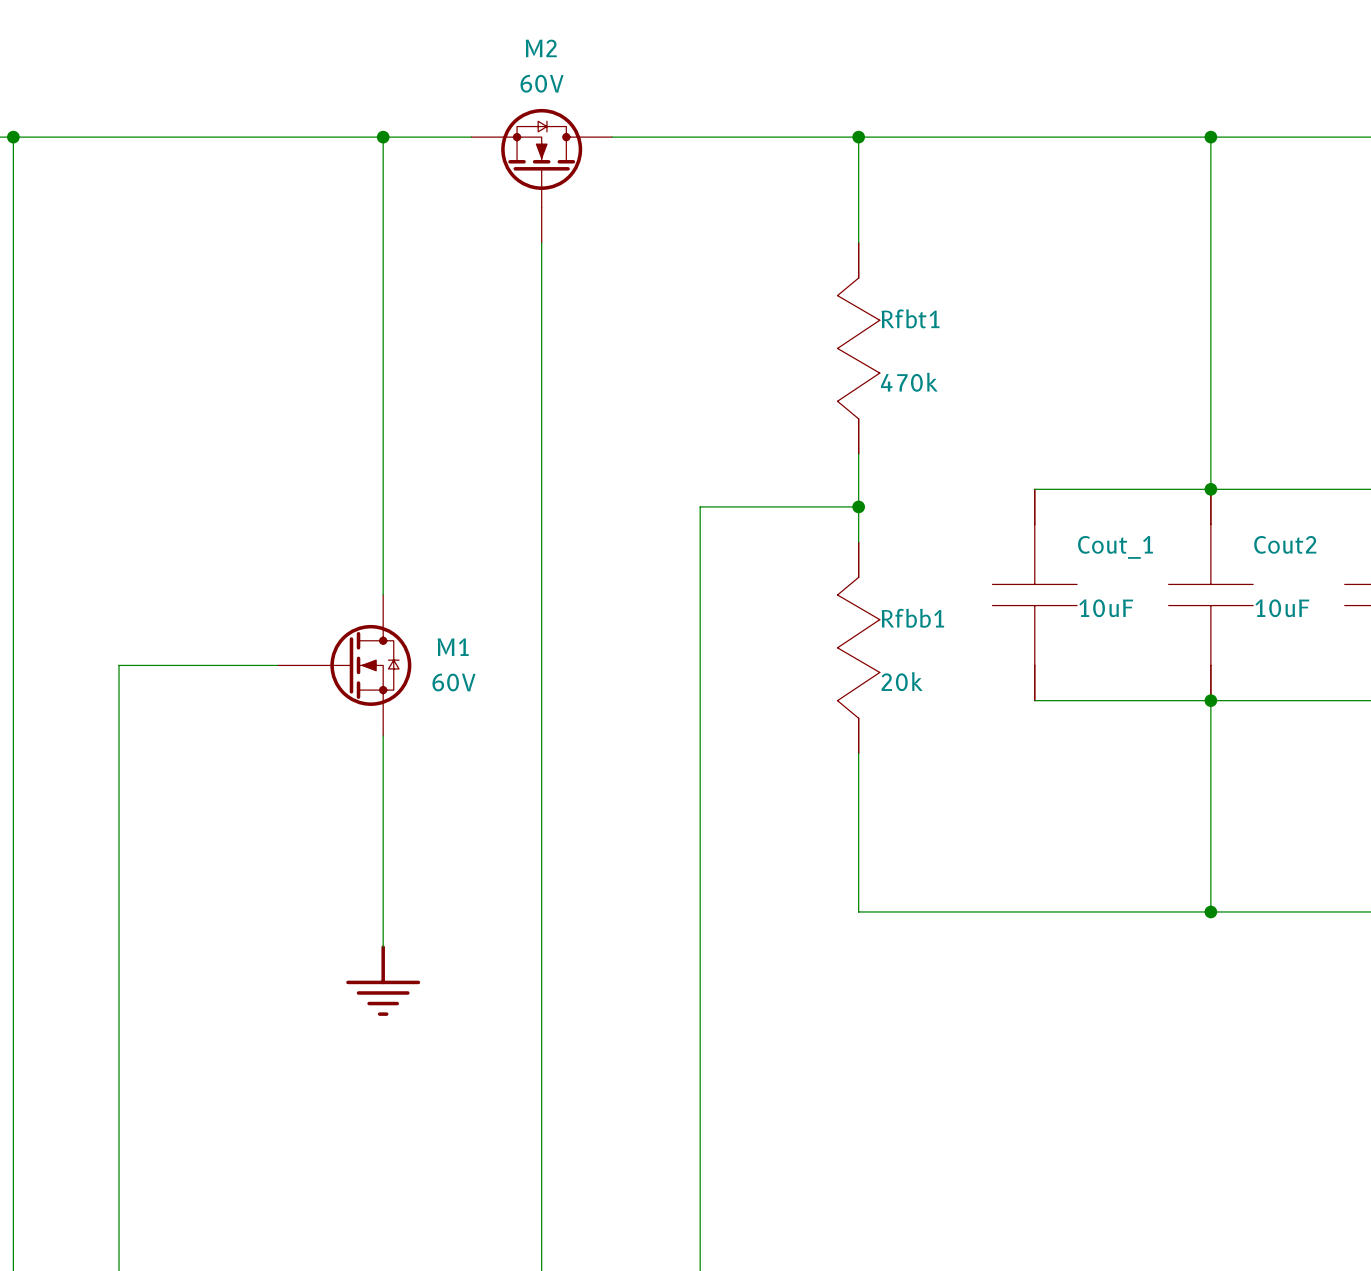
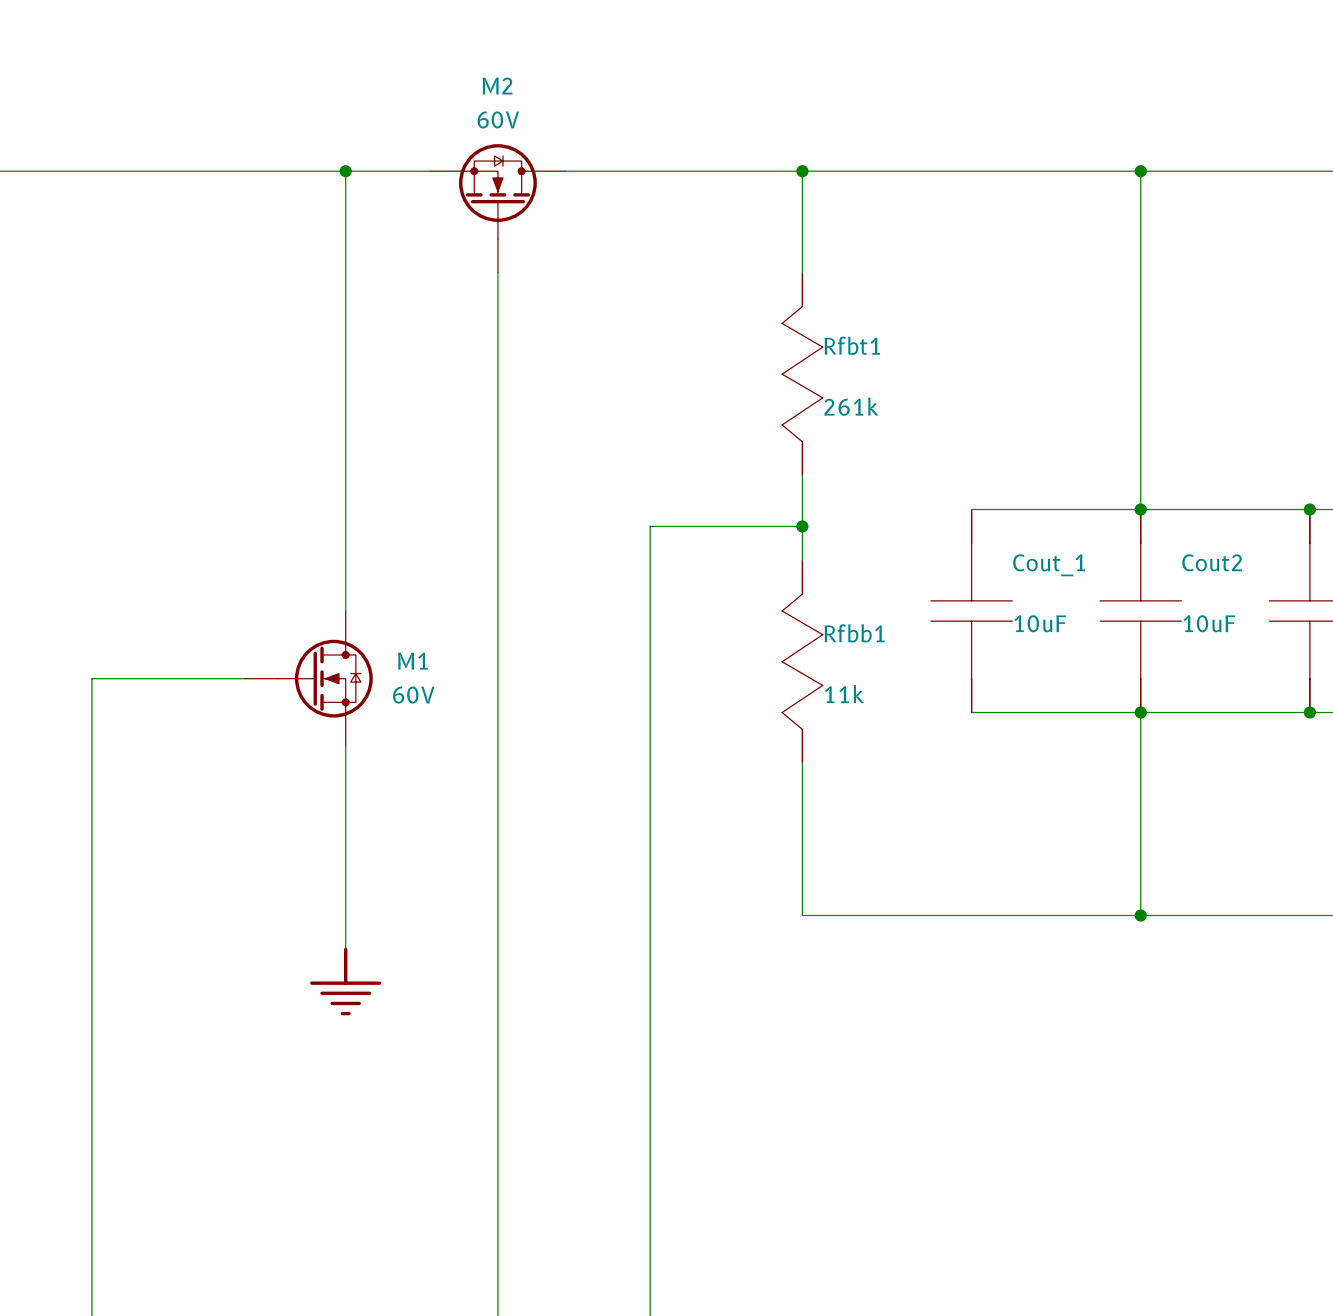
Rfbt1 text: 470k (909, 382) -> 261k (851, 406)
Rfbb1 text: 20k (902, 681) -> 11k (844, 694)

